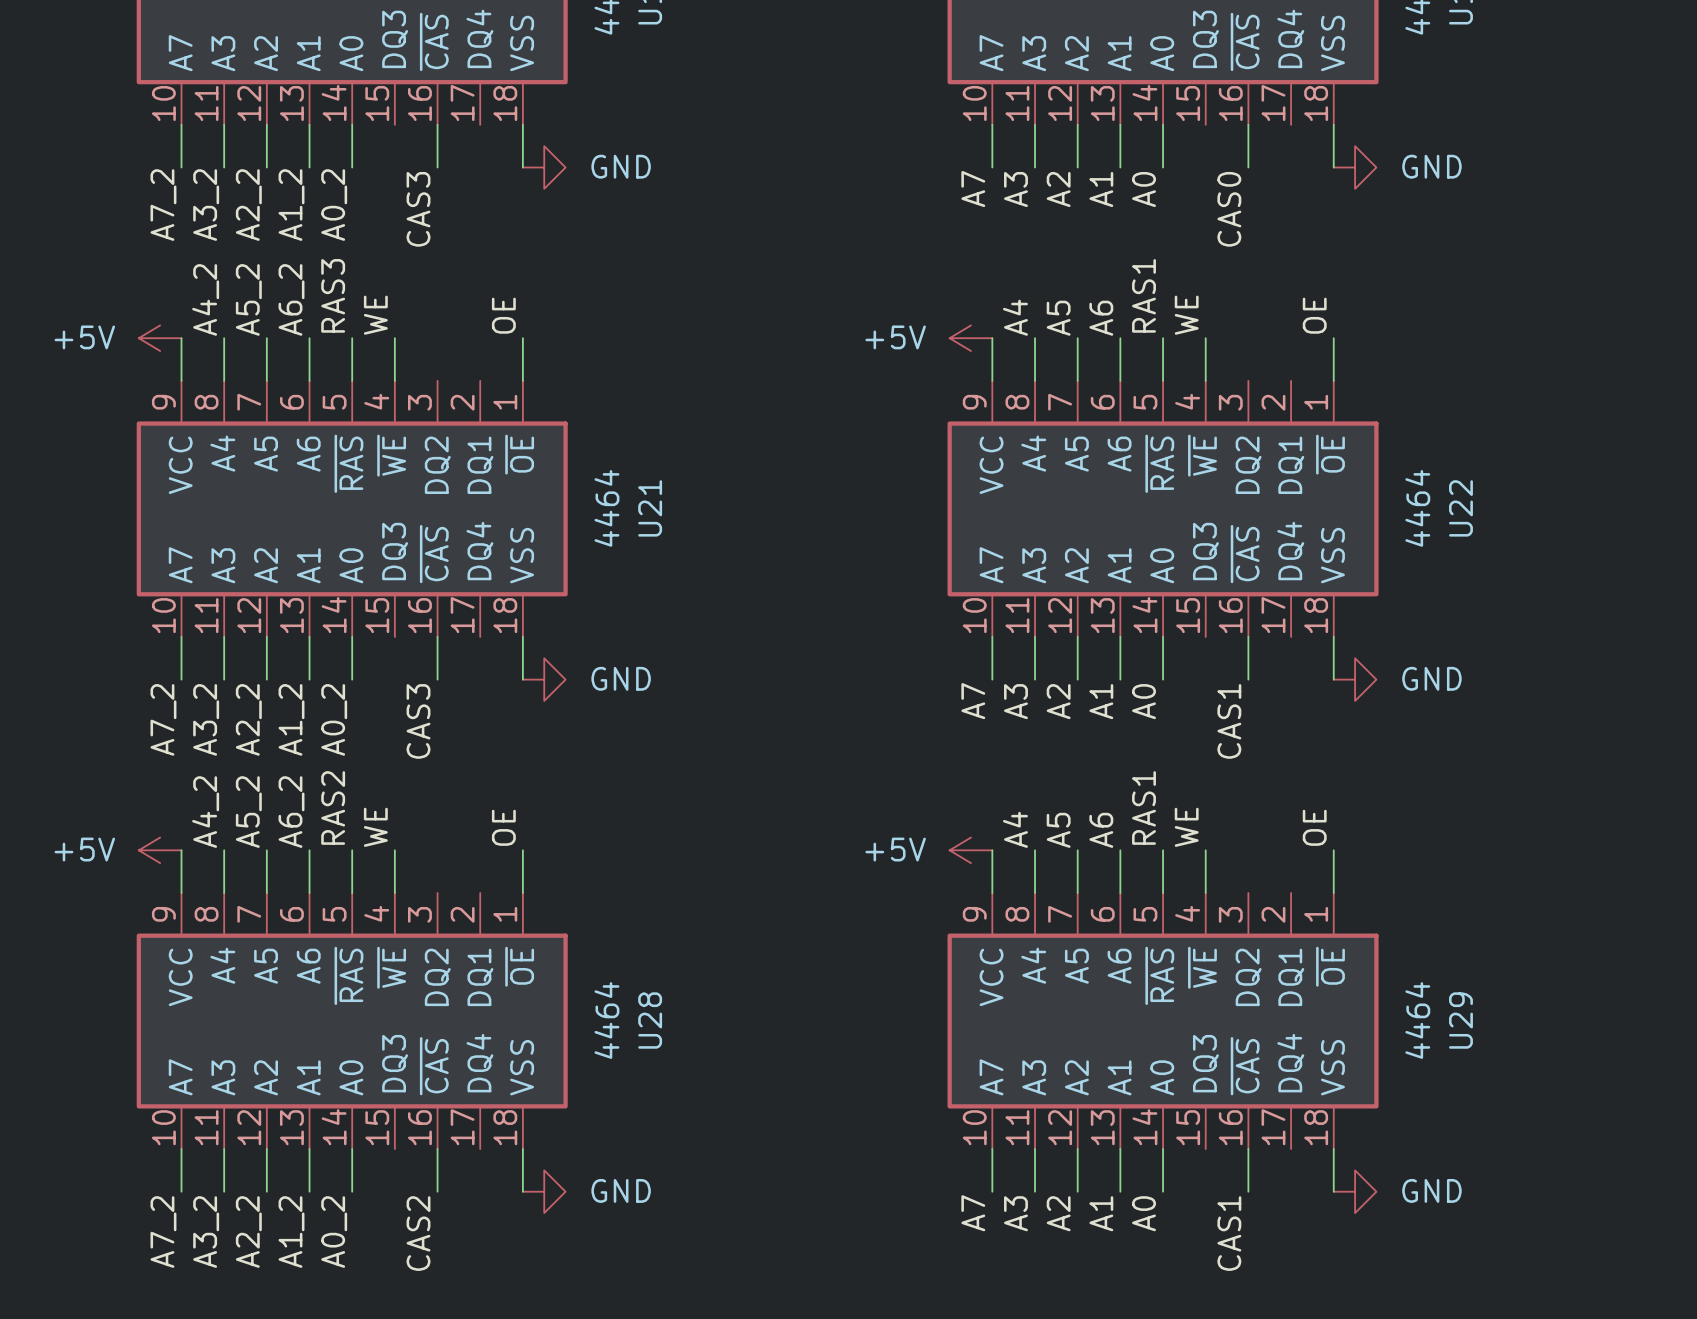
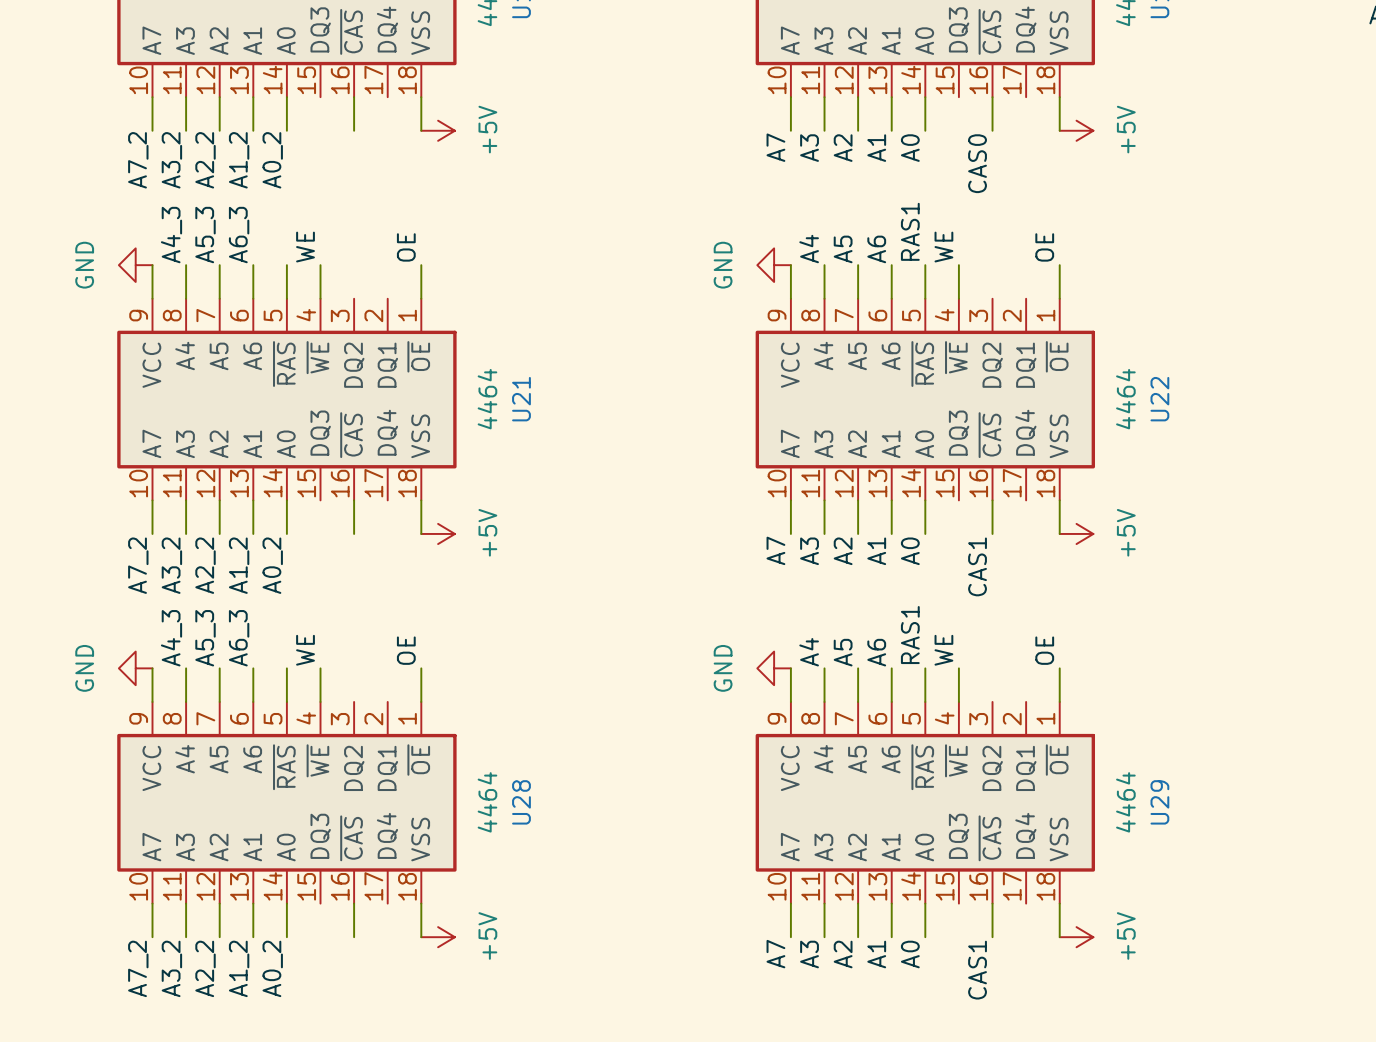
power symbol: GND (544, 167) -> +5V (438, 130)
power symbol: GND (1355, 167) -> +5V (1076, 130)
label: CAS3 (418, 209) -> none
label: RAS3 (333, 295) -> none
label: A4_2 (205, 299) -> A4_3 (171, 235)
label: A5_2 (248, 299) -> A5_3 (205, 235)
label: A6_2 (291, 299) -> A6_3 (239, 235)
power symbol: +5V (160, 338) -> GND (135, 265)
power symbol: +5V (971, 338) -> GND (774, 265)
power symbol: GND (544, 679) -> +5V (438, 533)
power symbol: GND (1355, 679) -> +5V (1076, 533)
label: CAS3 (418, 721) -> none
label: RAS2 (333, 807) -> none
label: A4_2 (205, 812) -> A4_3 (171, 638)
label: A5_2 (248, 812) -> A5_3 (205, 638)
label: A6_2 (291, 812) -> A6_3 (239, 638)
power symbol: +5V (160, 850) -> GND (135, 668)
power symbol: +5V (971, 850) -> GND (774, 668)
power symbol: GND (544, 1191) -> +5V (438, 937)
power symbol: GND (1355, 1191) -> +5V (1076, 937)
label: CAS2 (418, 1233) -> none

